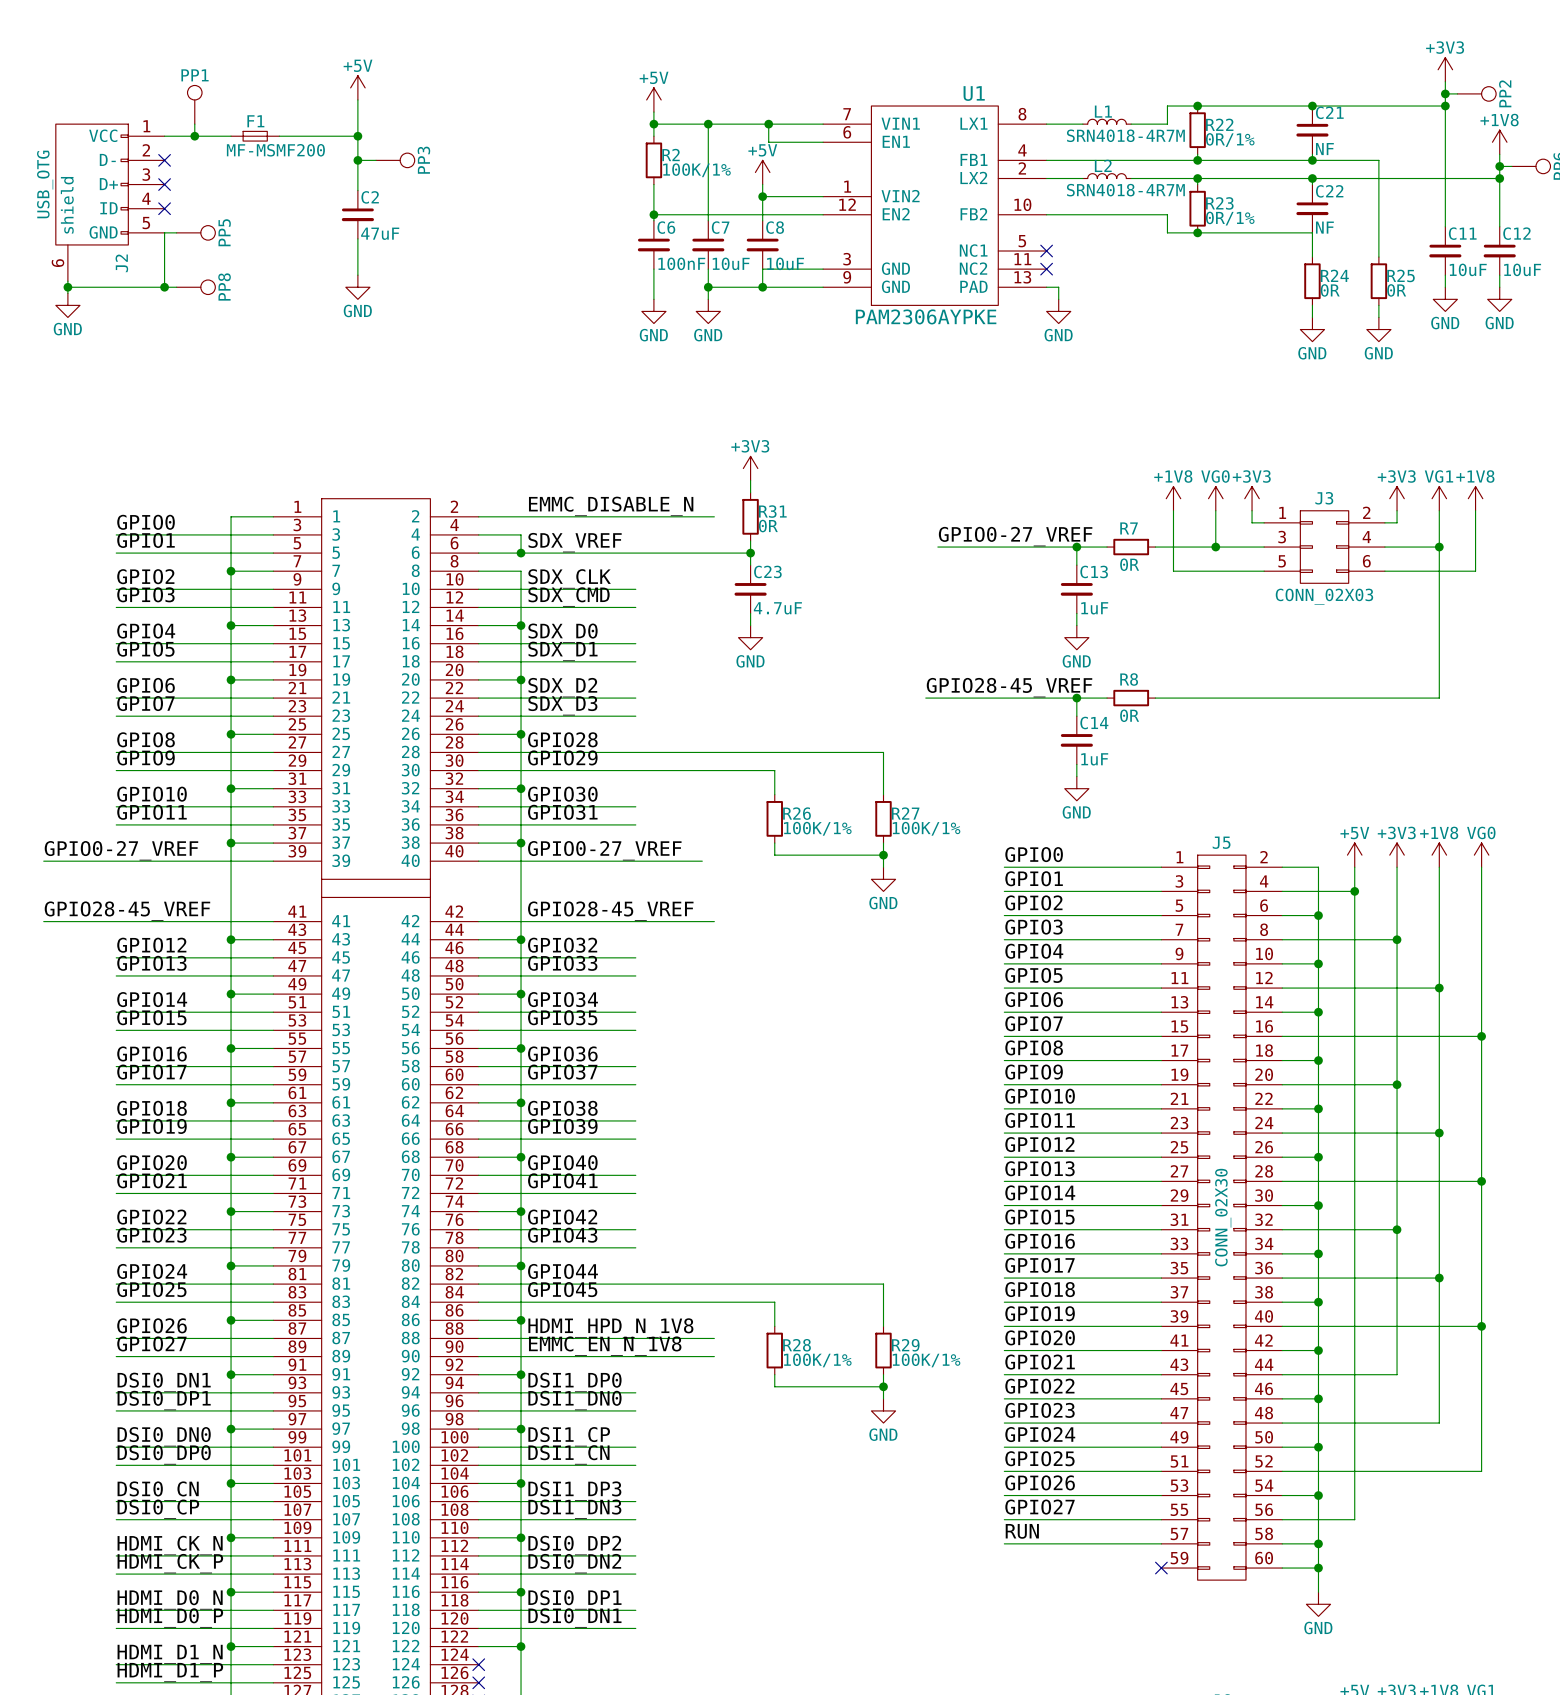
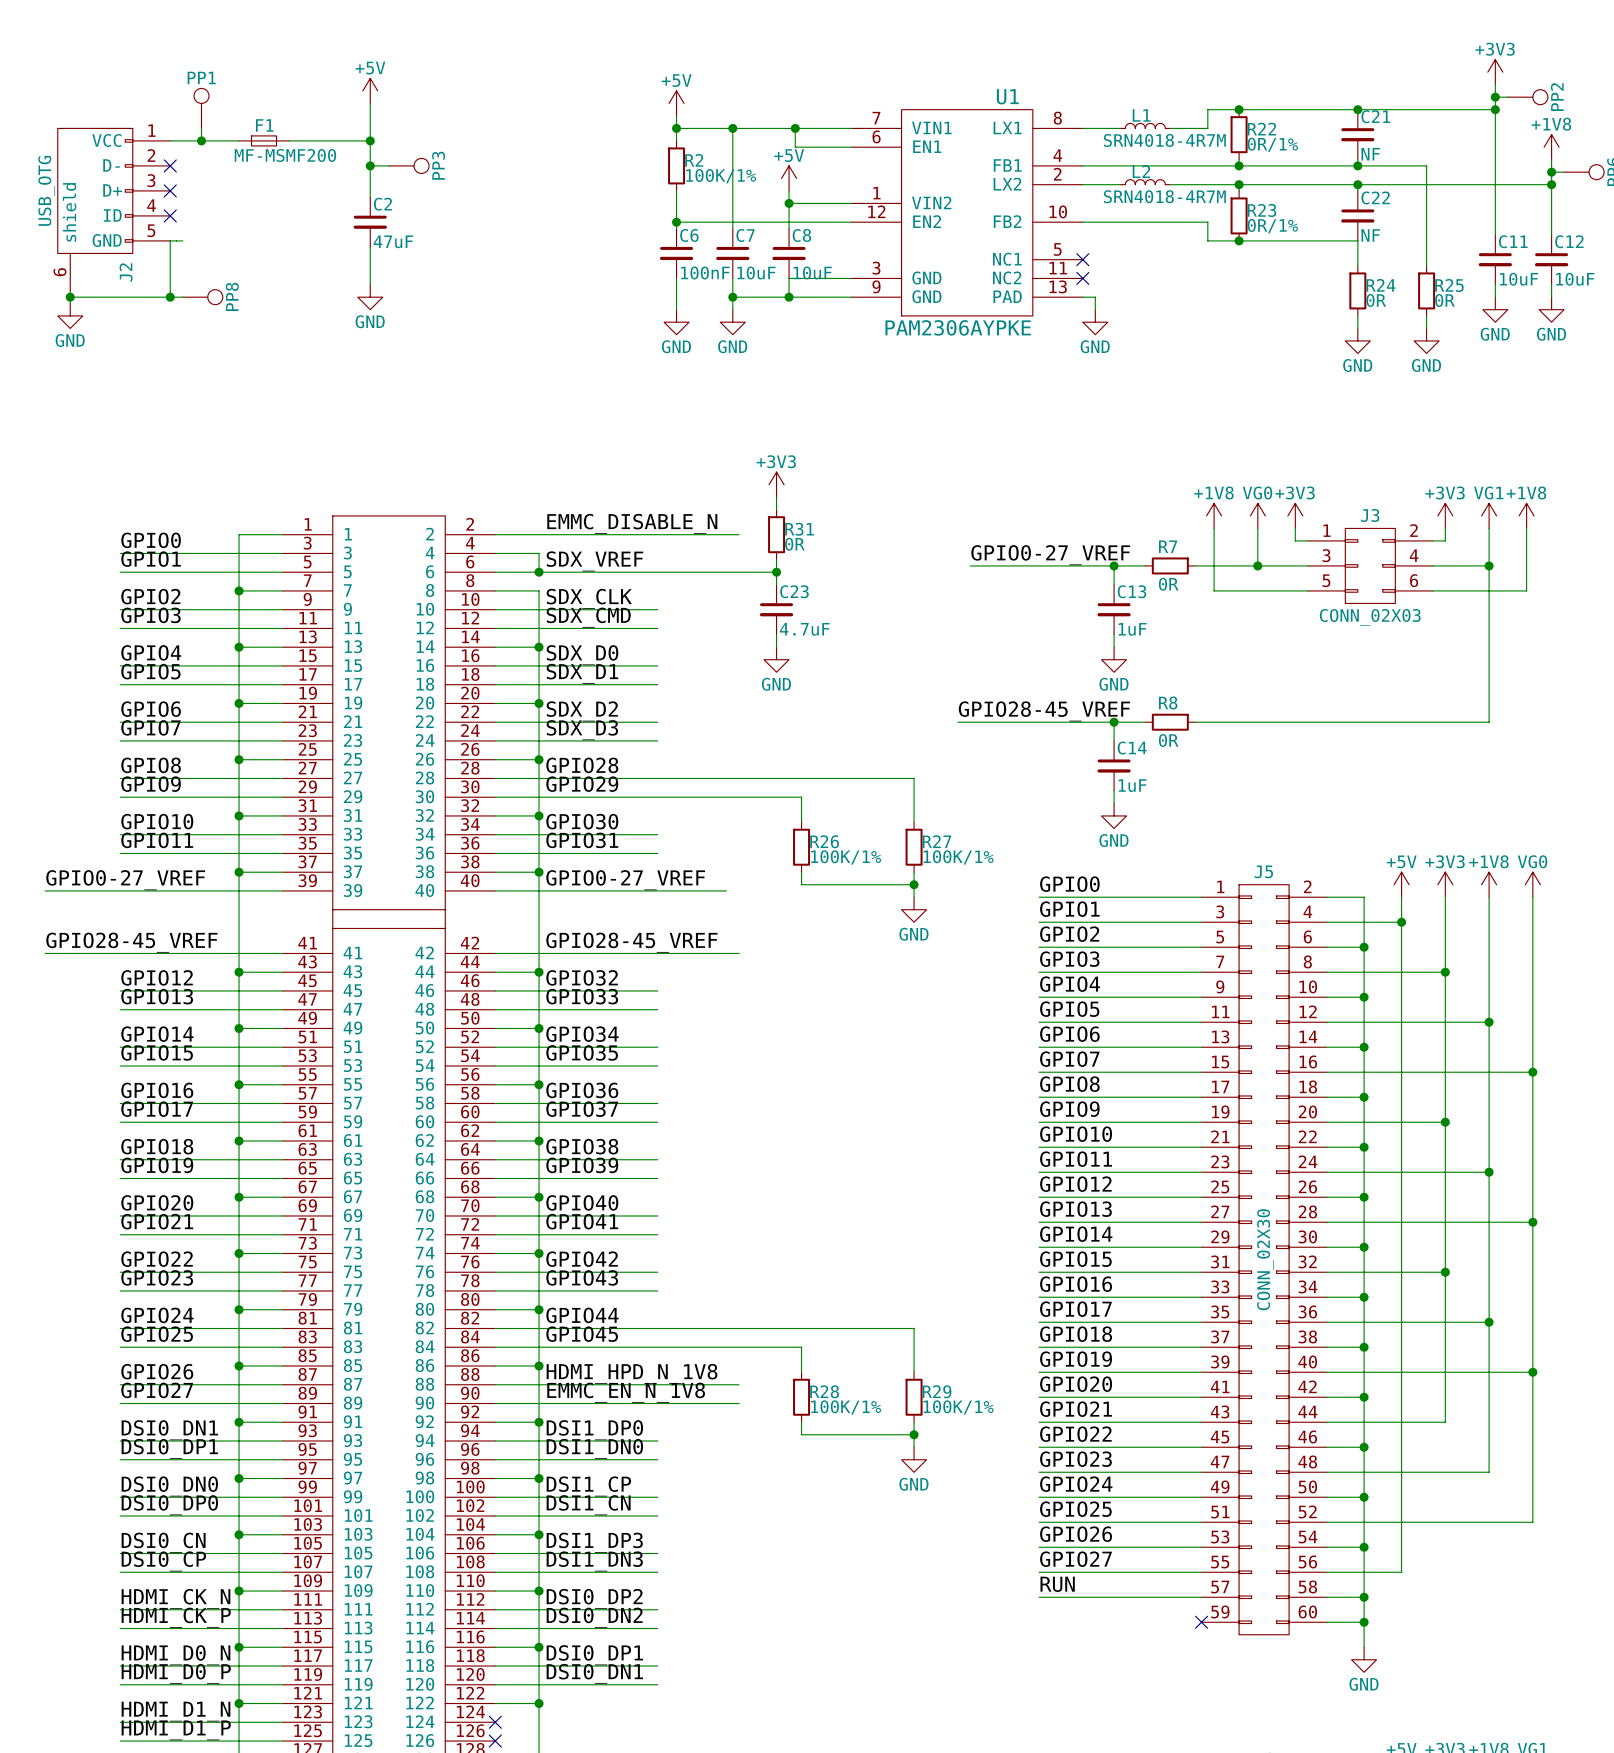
PP5: (195, 232) -> none

